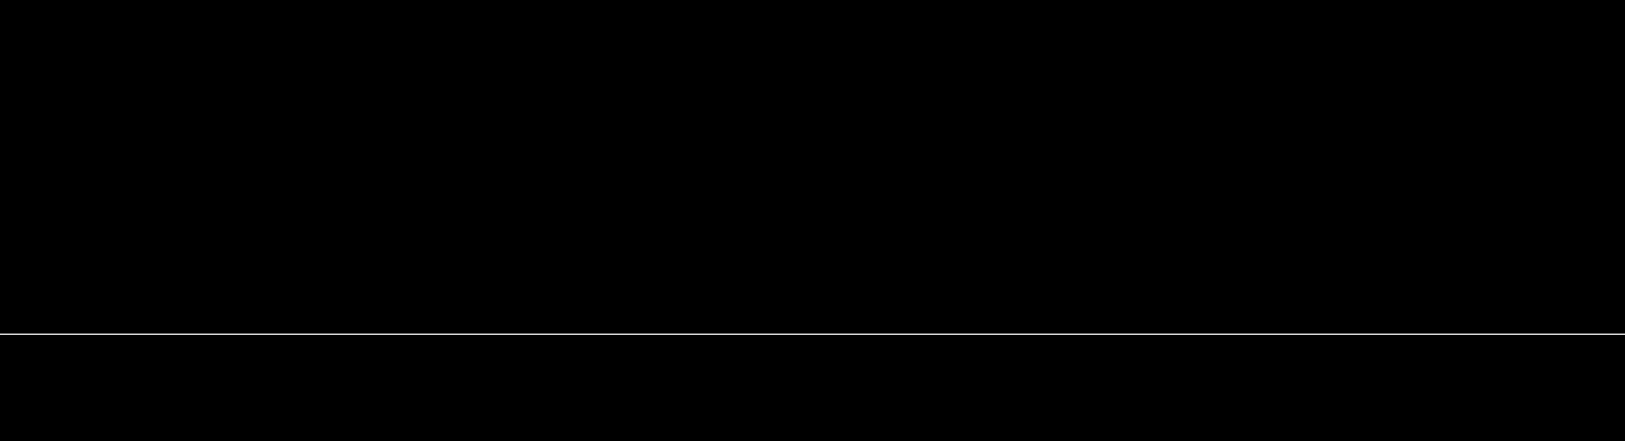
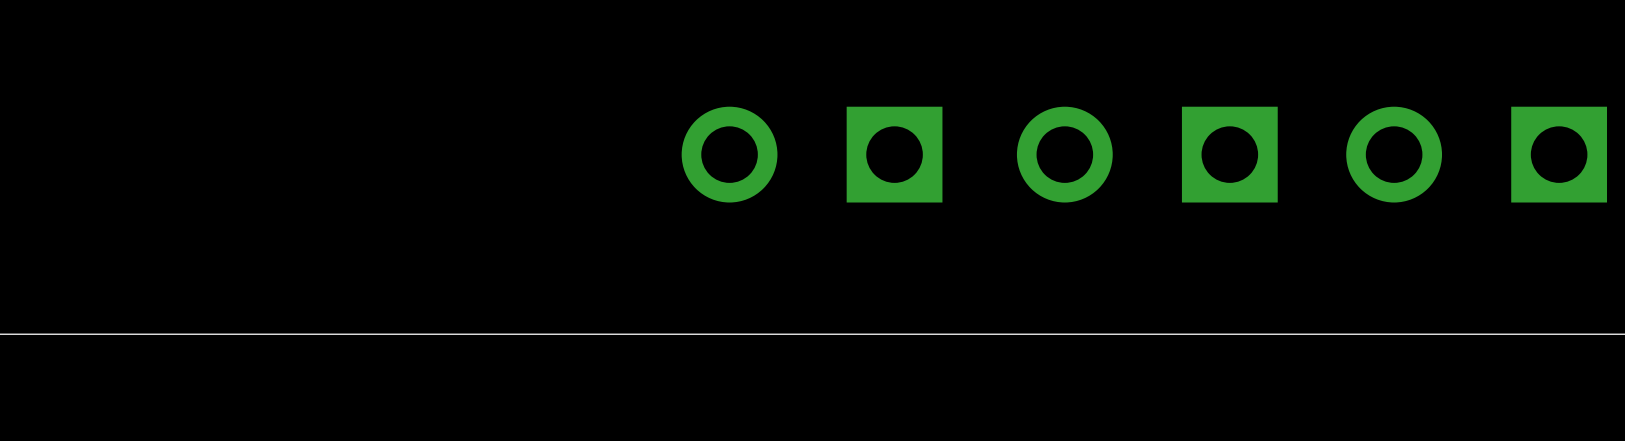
part: none -> (812, 154)
part: none -> (1147, 154)
part: none -> (1476, 154)

